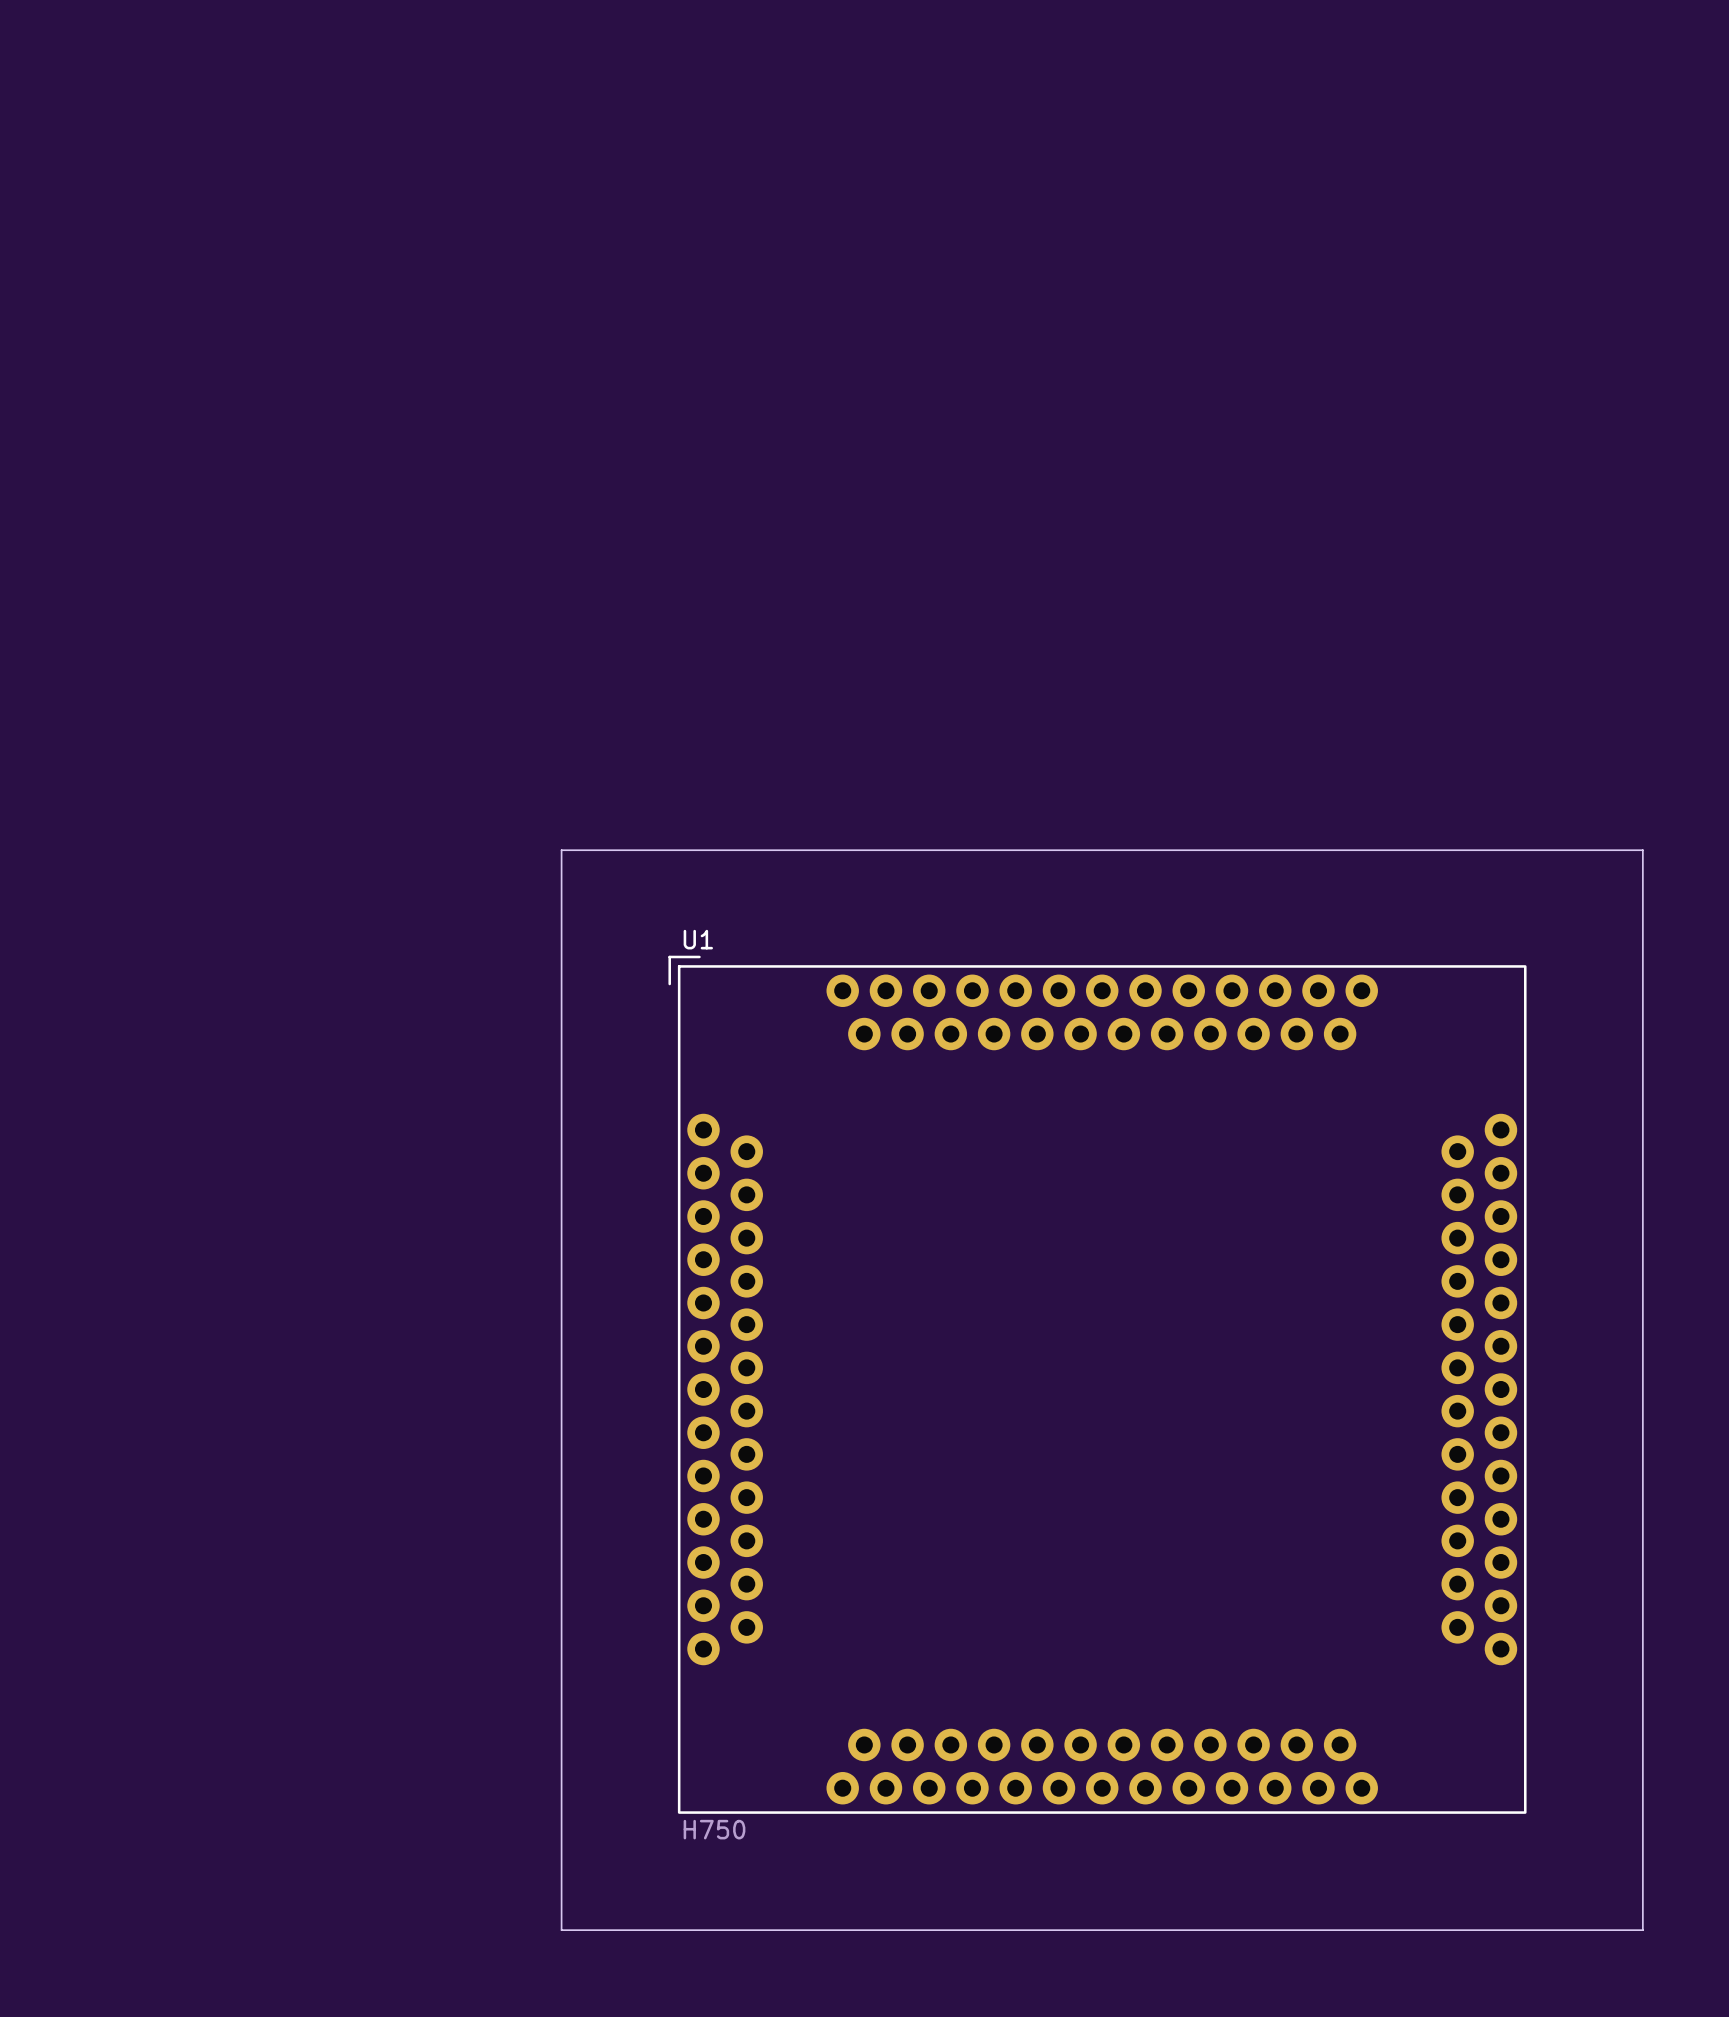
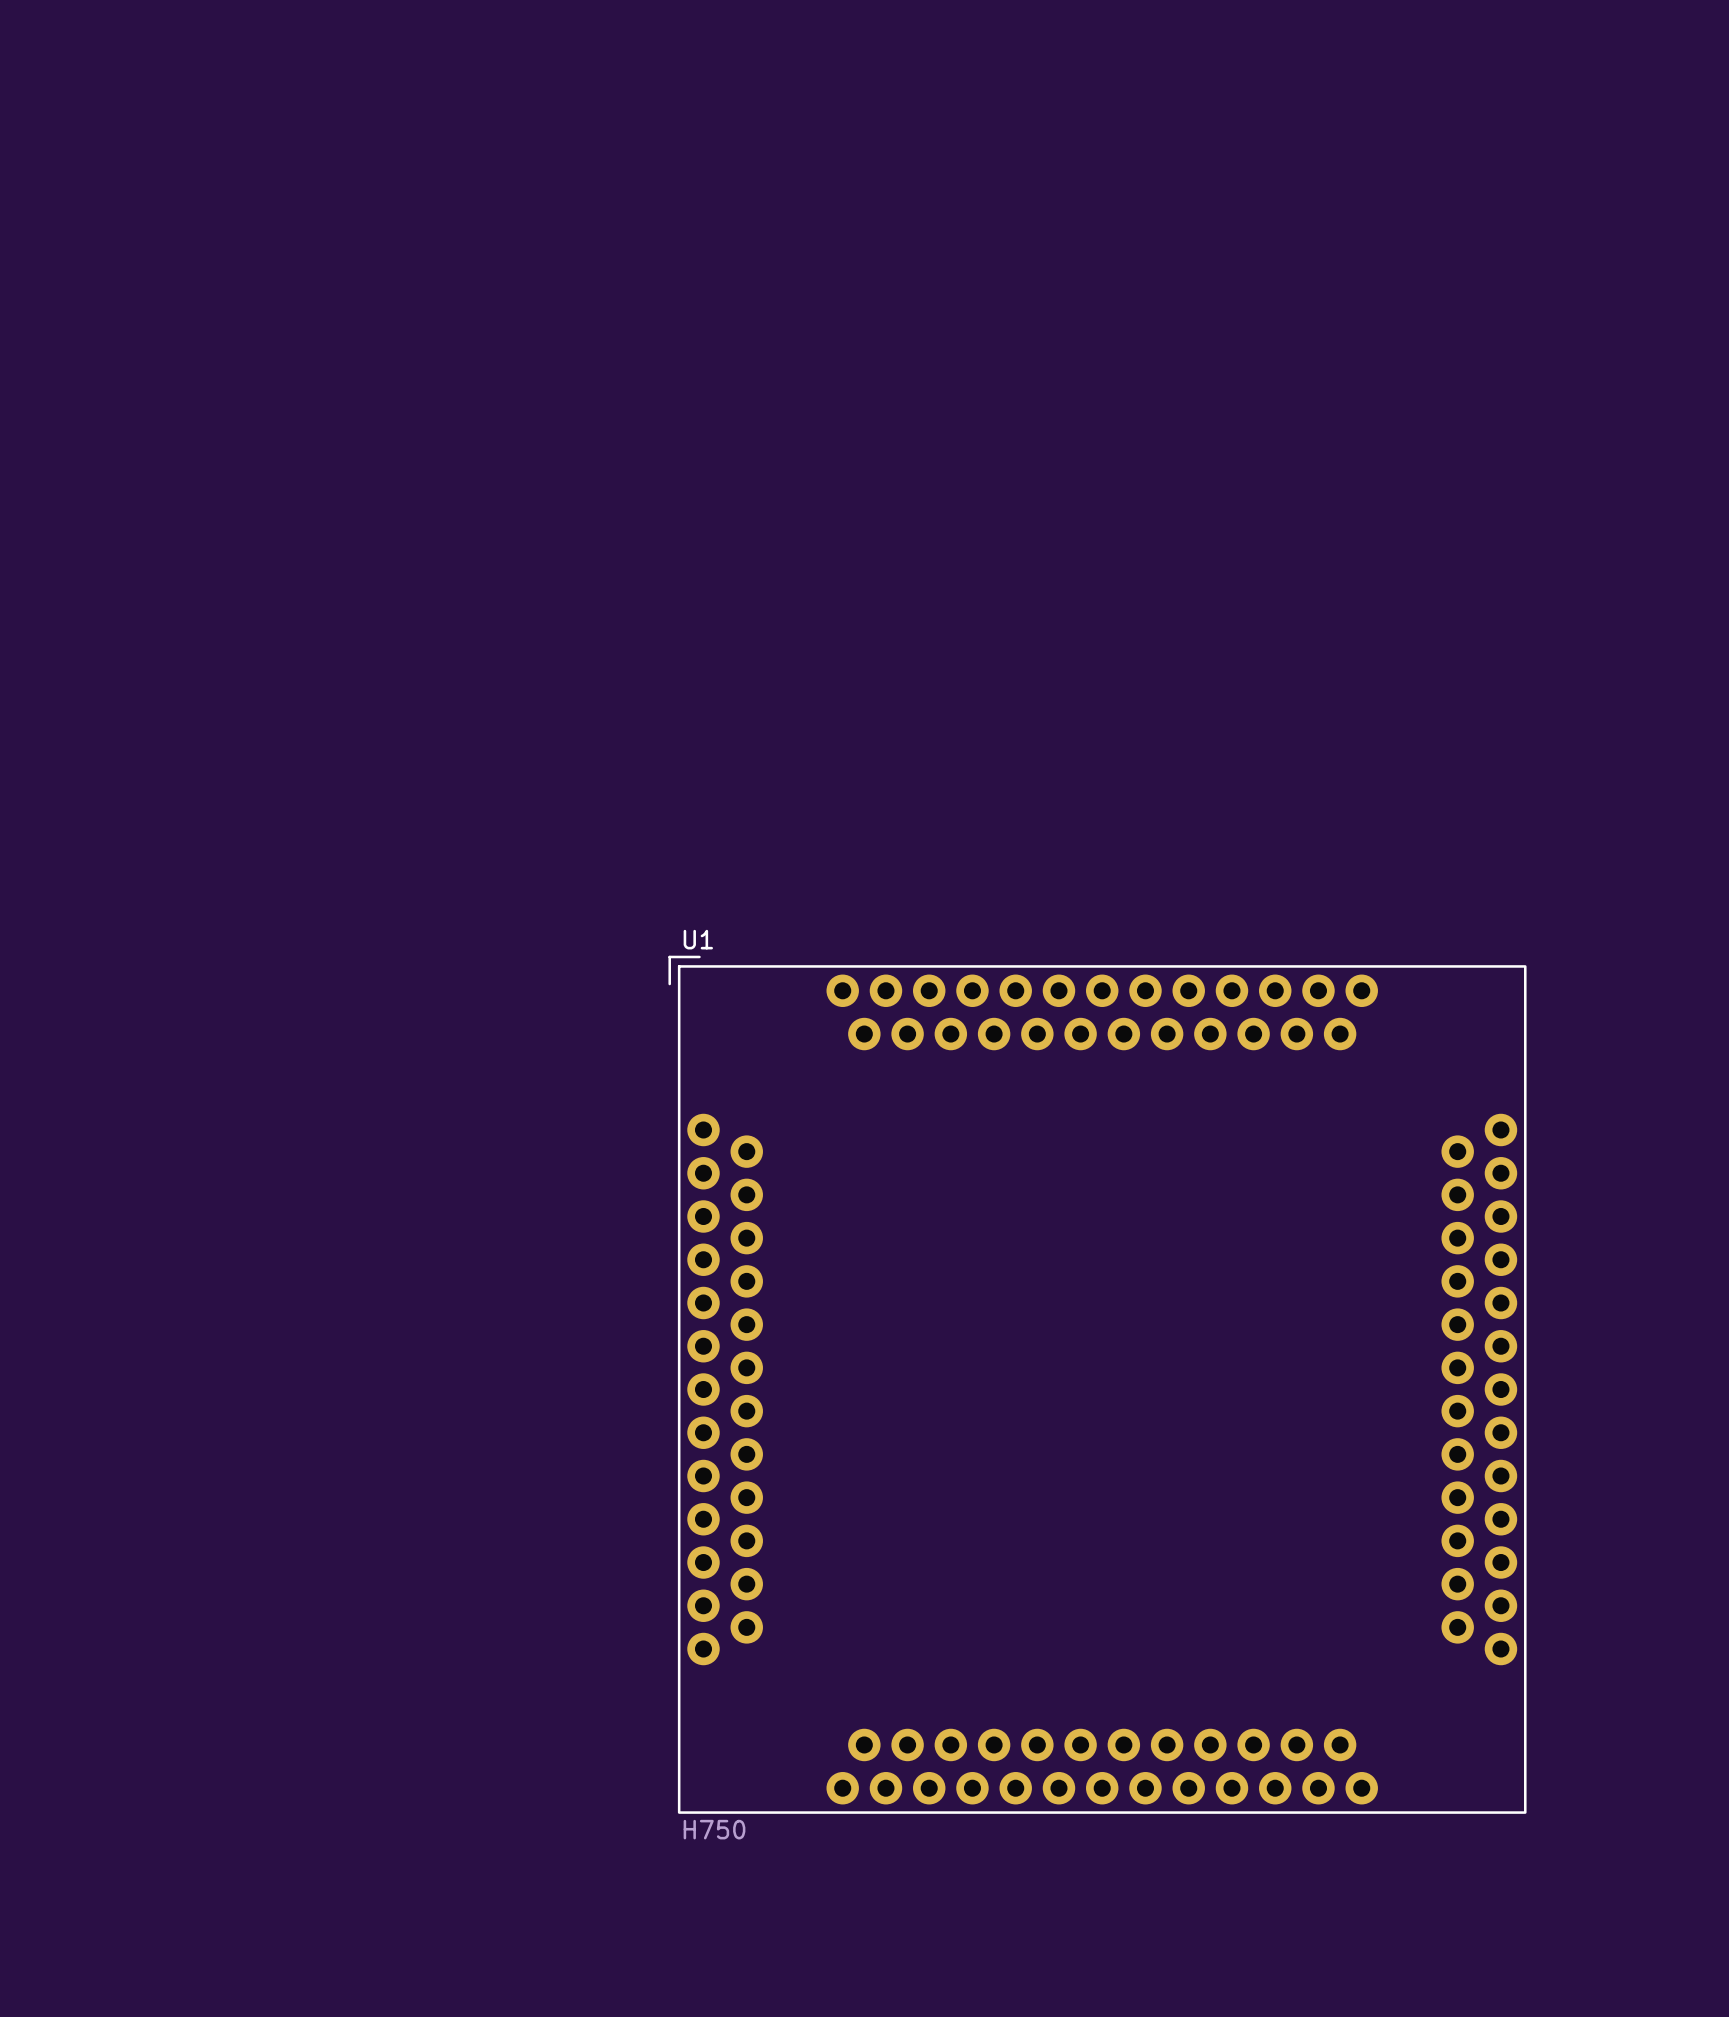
board edge: (561, 850) (1642, 850) (1642, 1930) (561, 1930) (561, 850) -> none

